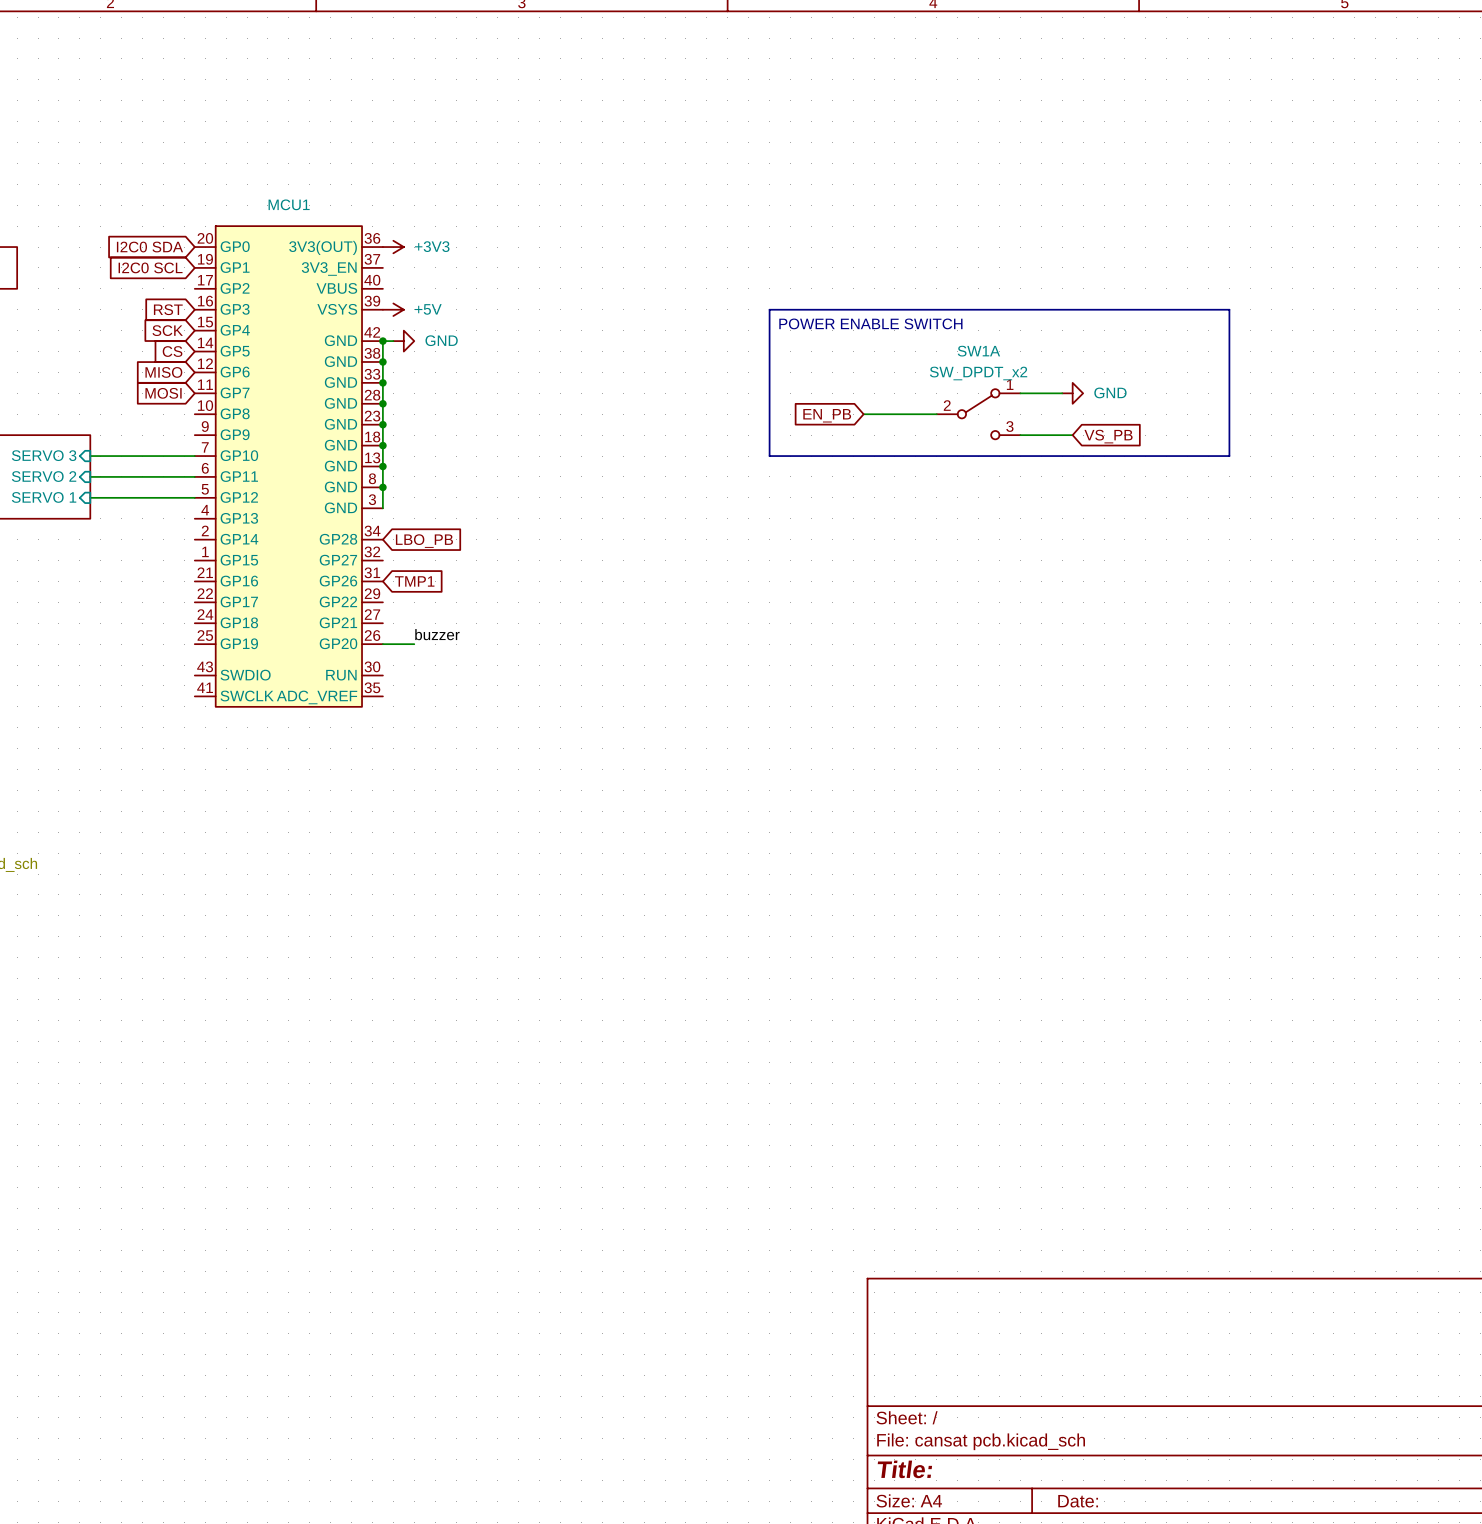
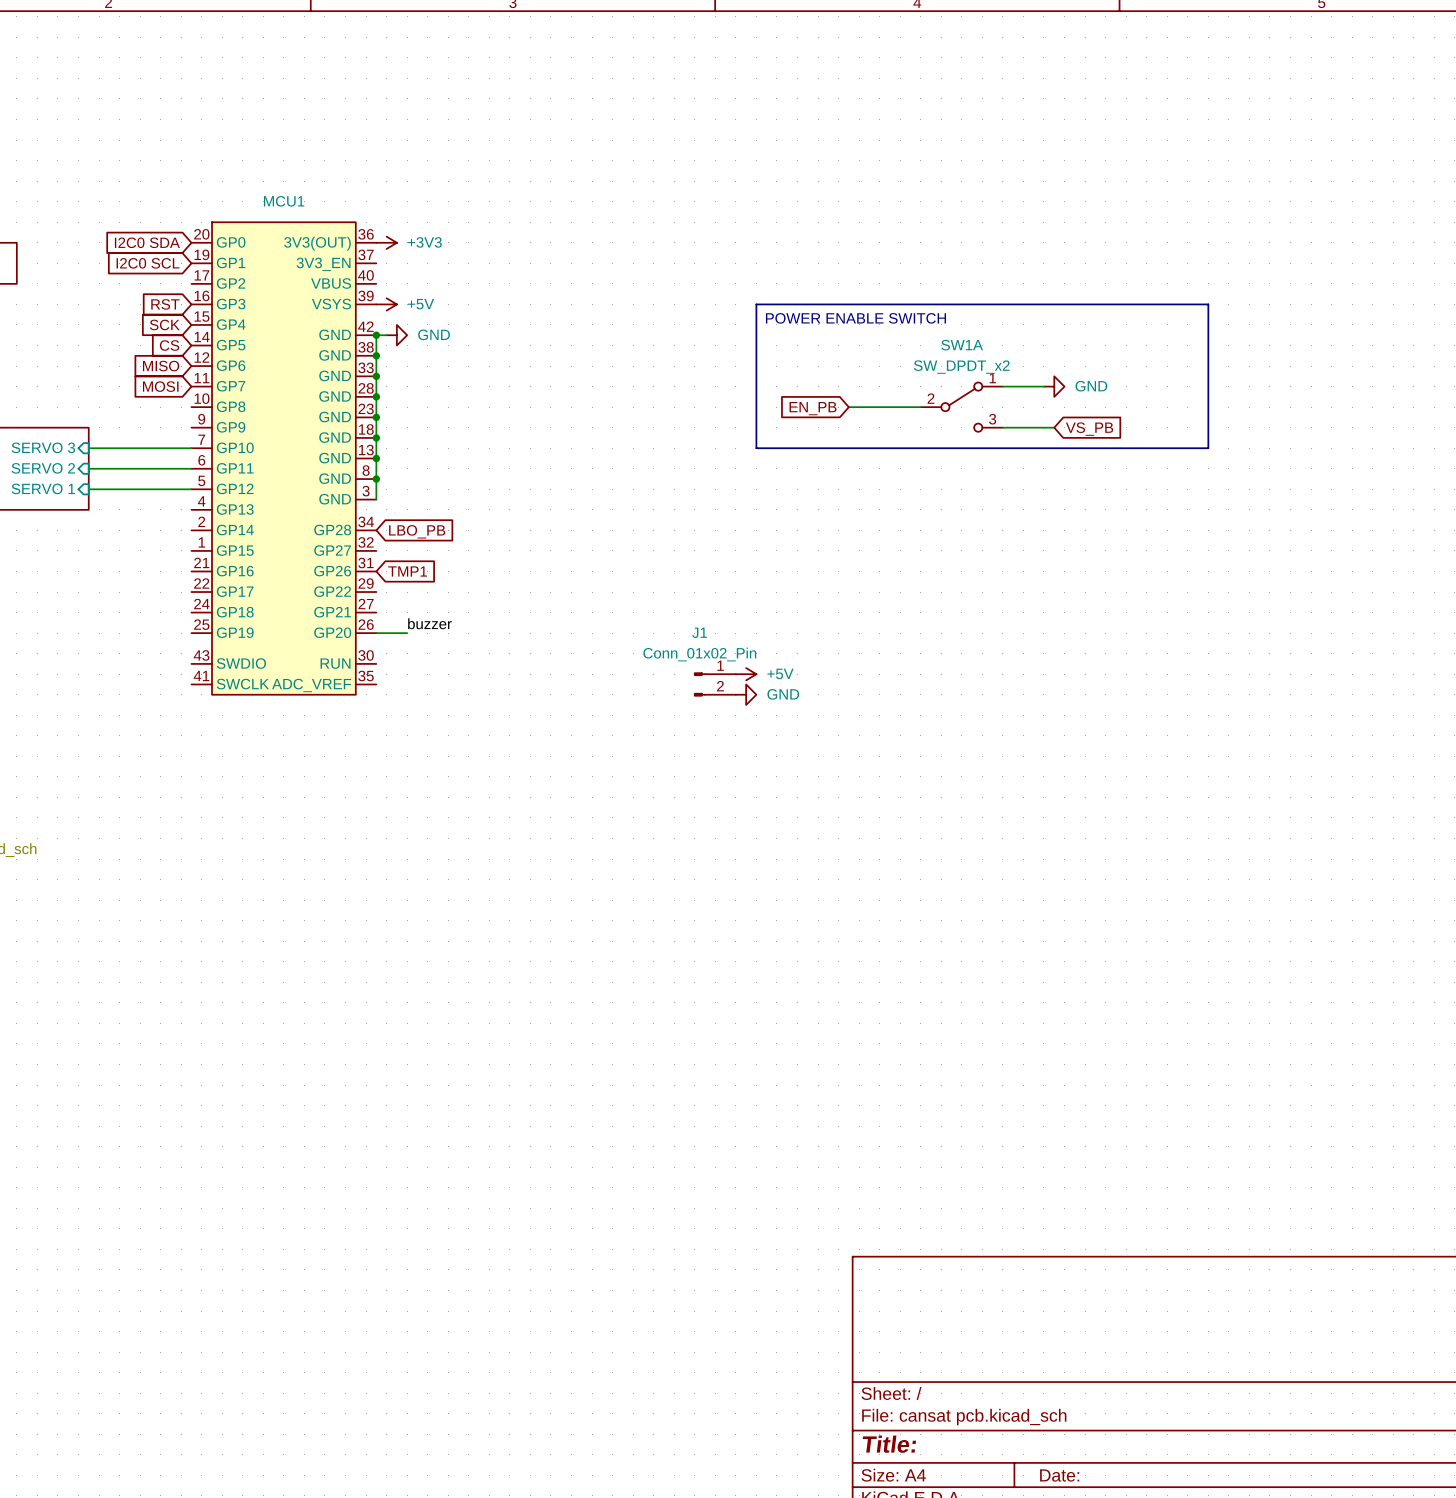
power symbol: none -> +5V (746, 674)
J1: none -> Conn_01x02_Pin (715, 684)
power symbol: none -> GND (746, 694)

